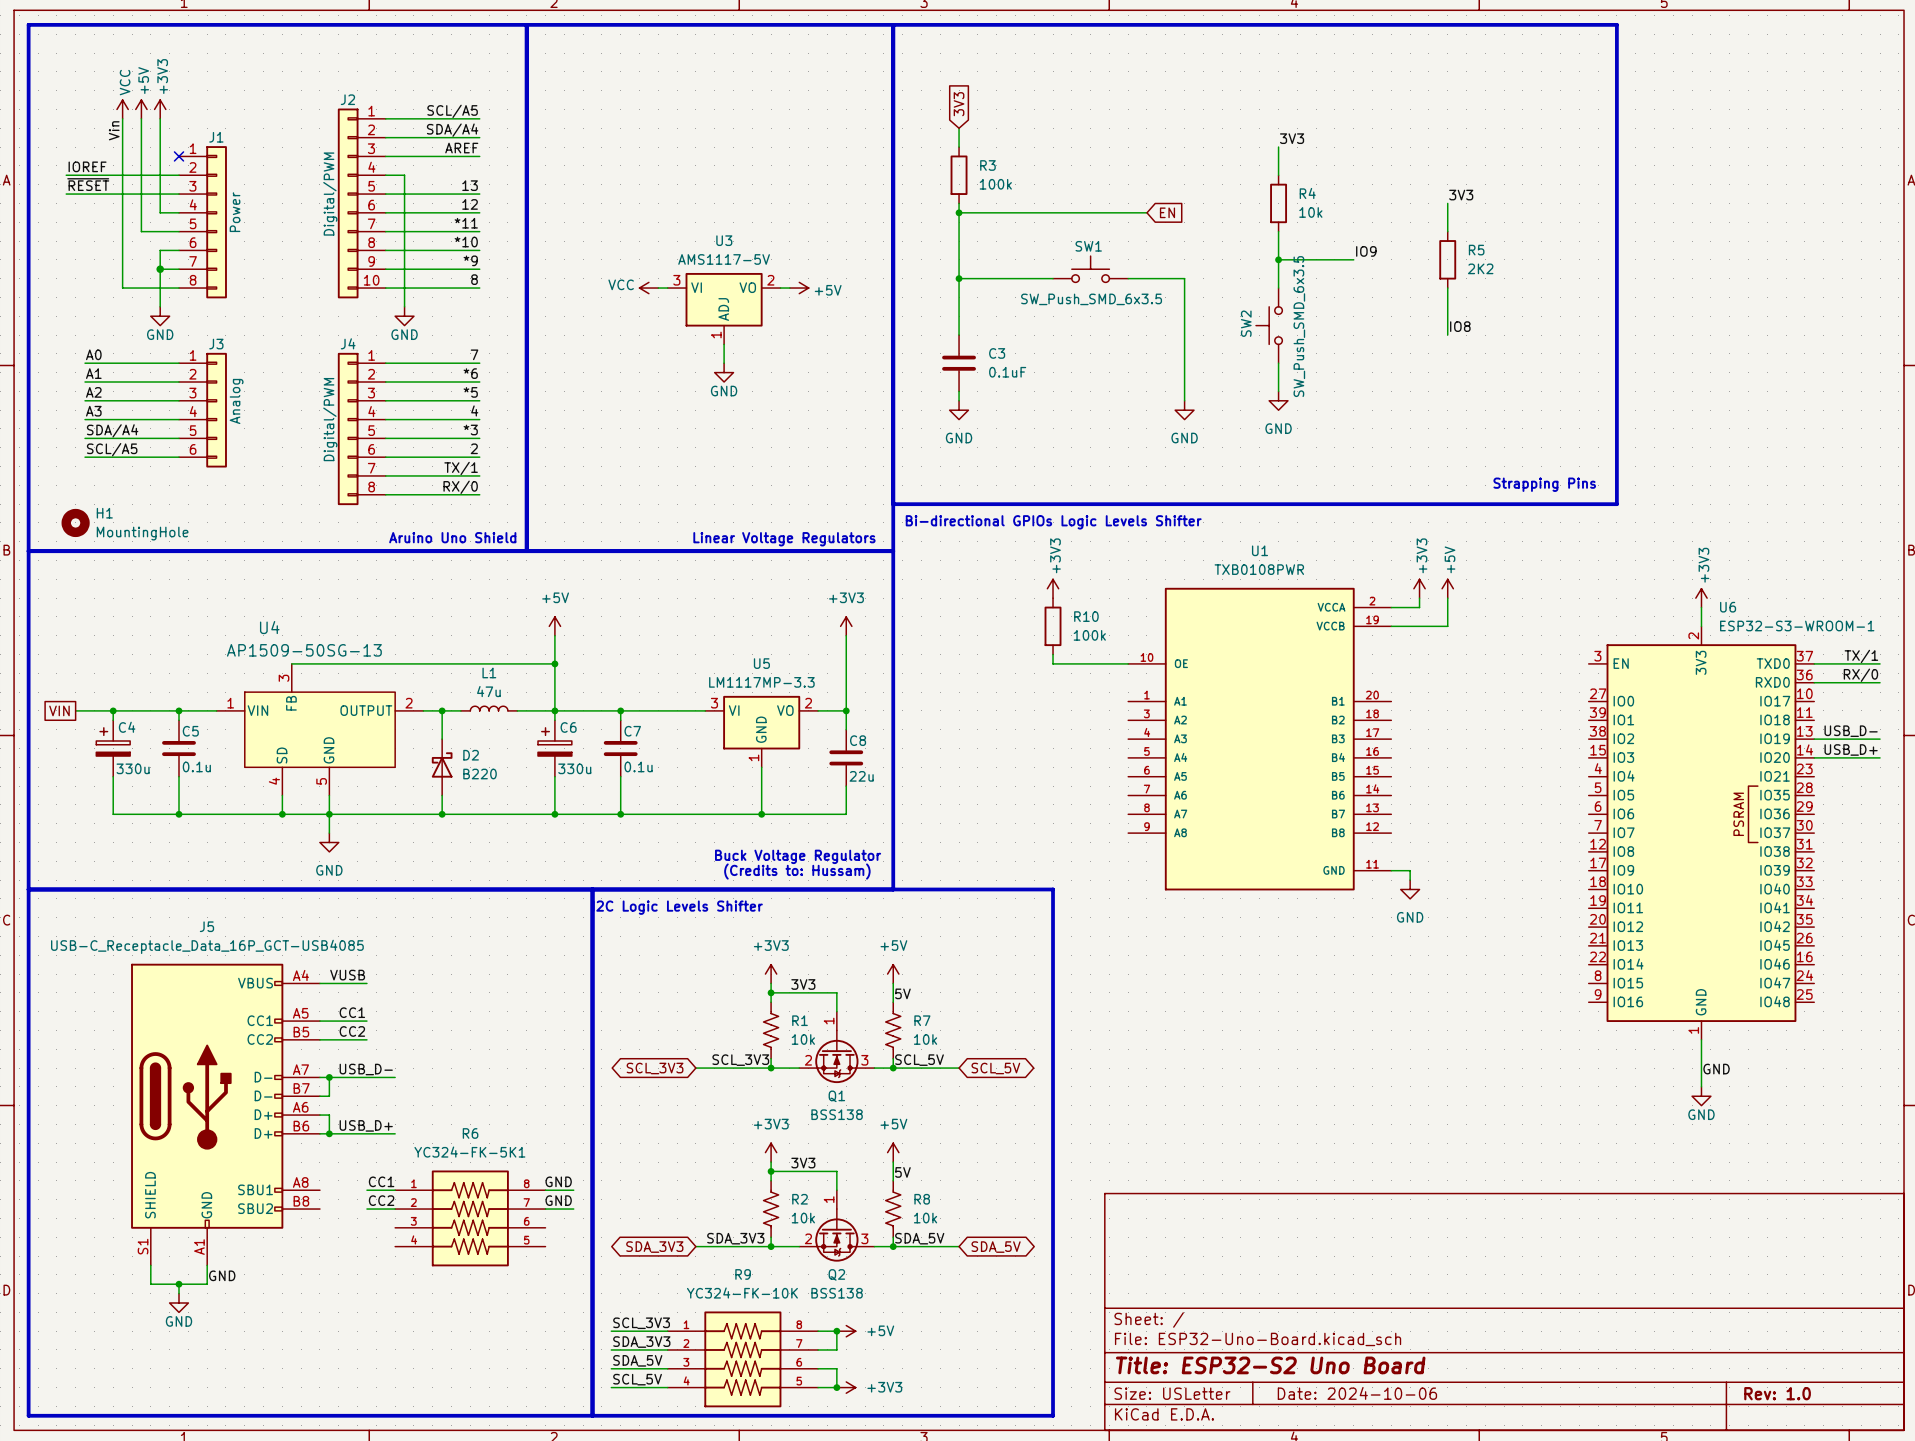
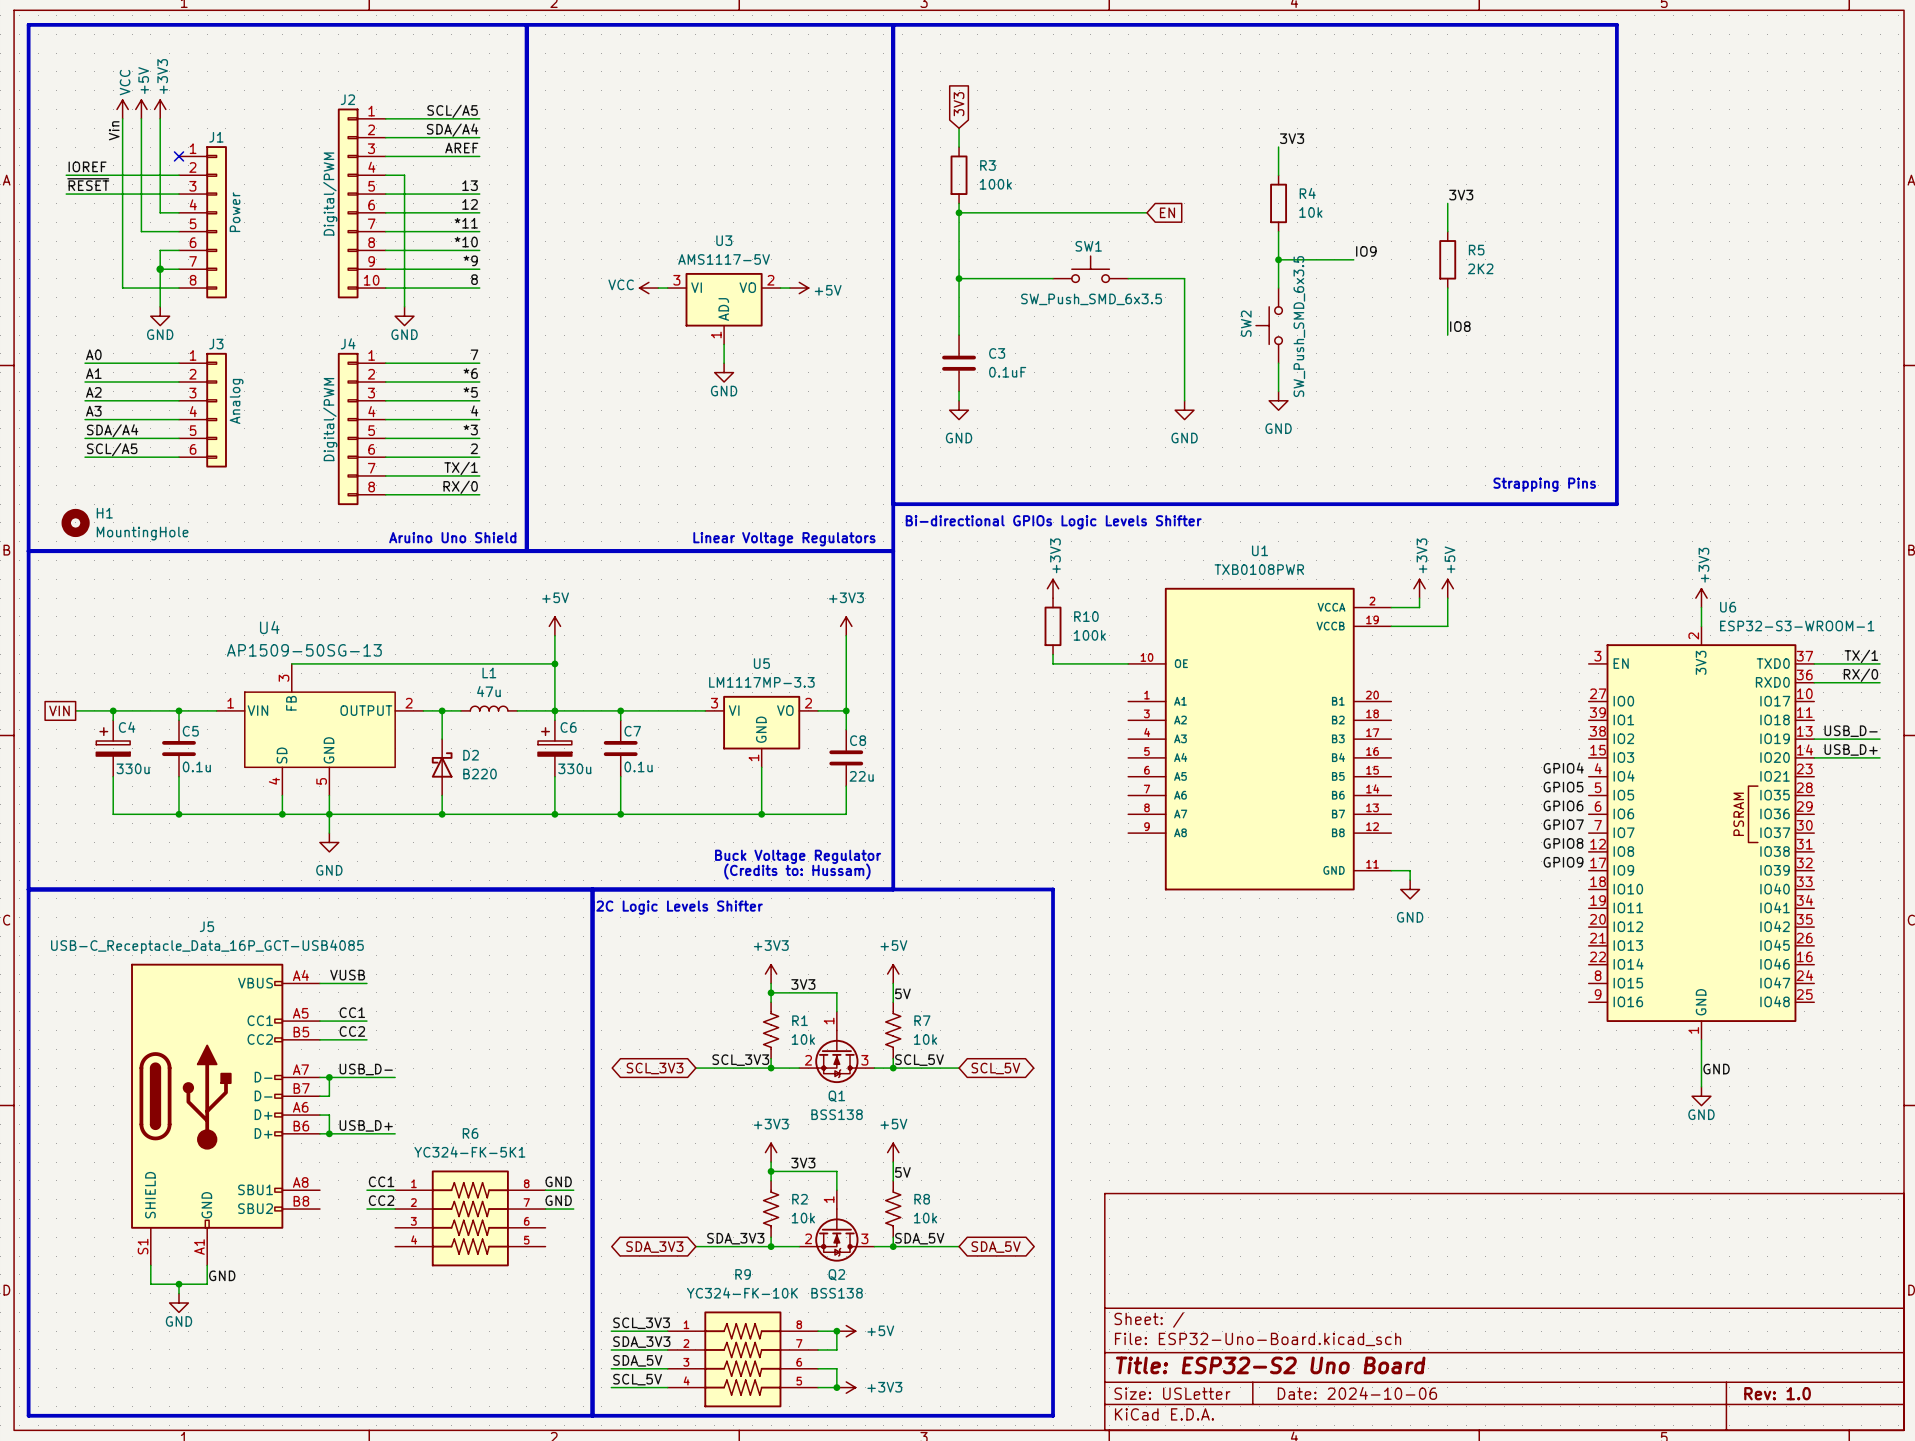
label: none -> GPIO4 (1563, 768)
label: none -> GPIO5 (1563, 787)
label: none -> GPIO6 (1563, 805)
label: none -> GPIO7 (1563, 824)
label: none -> GPIO8 (1563, 843)
label: none -> GPIO9 (1563, 862)

